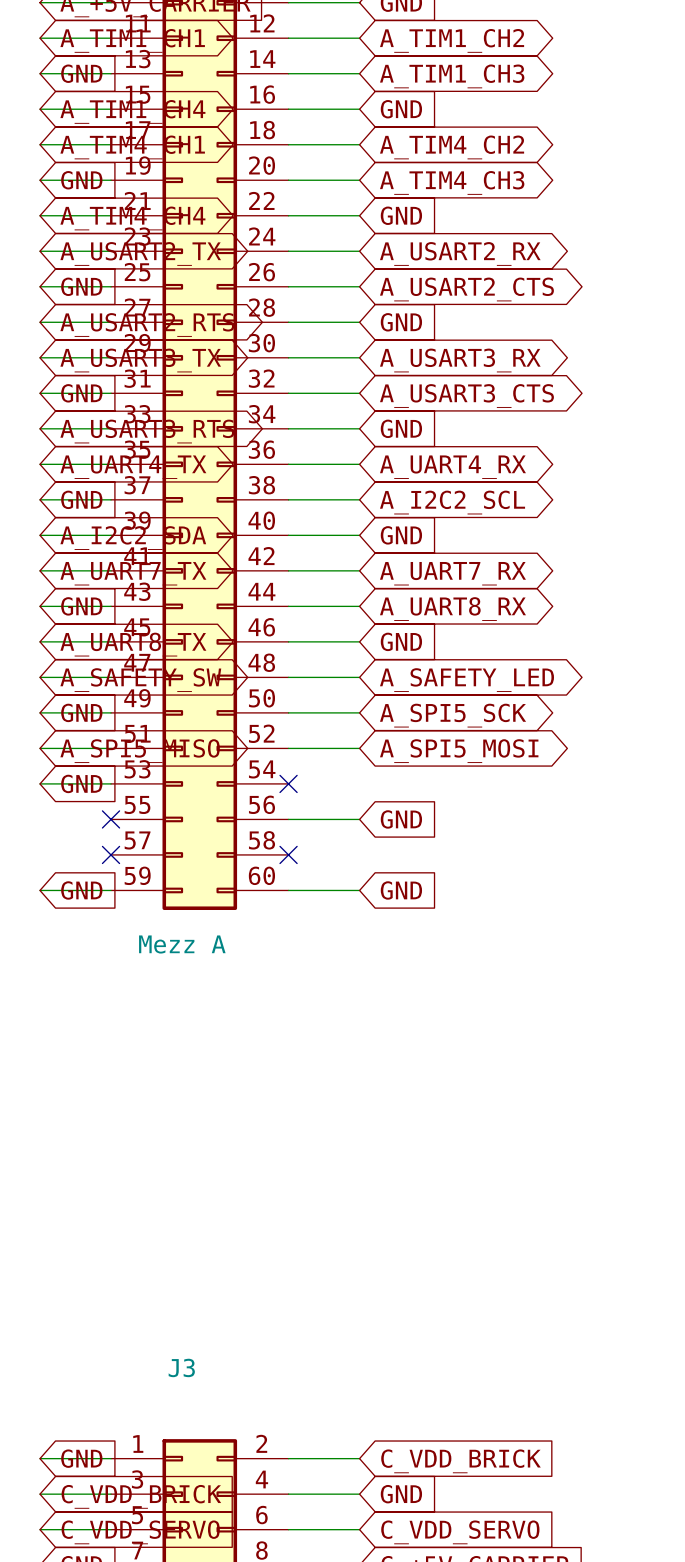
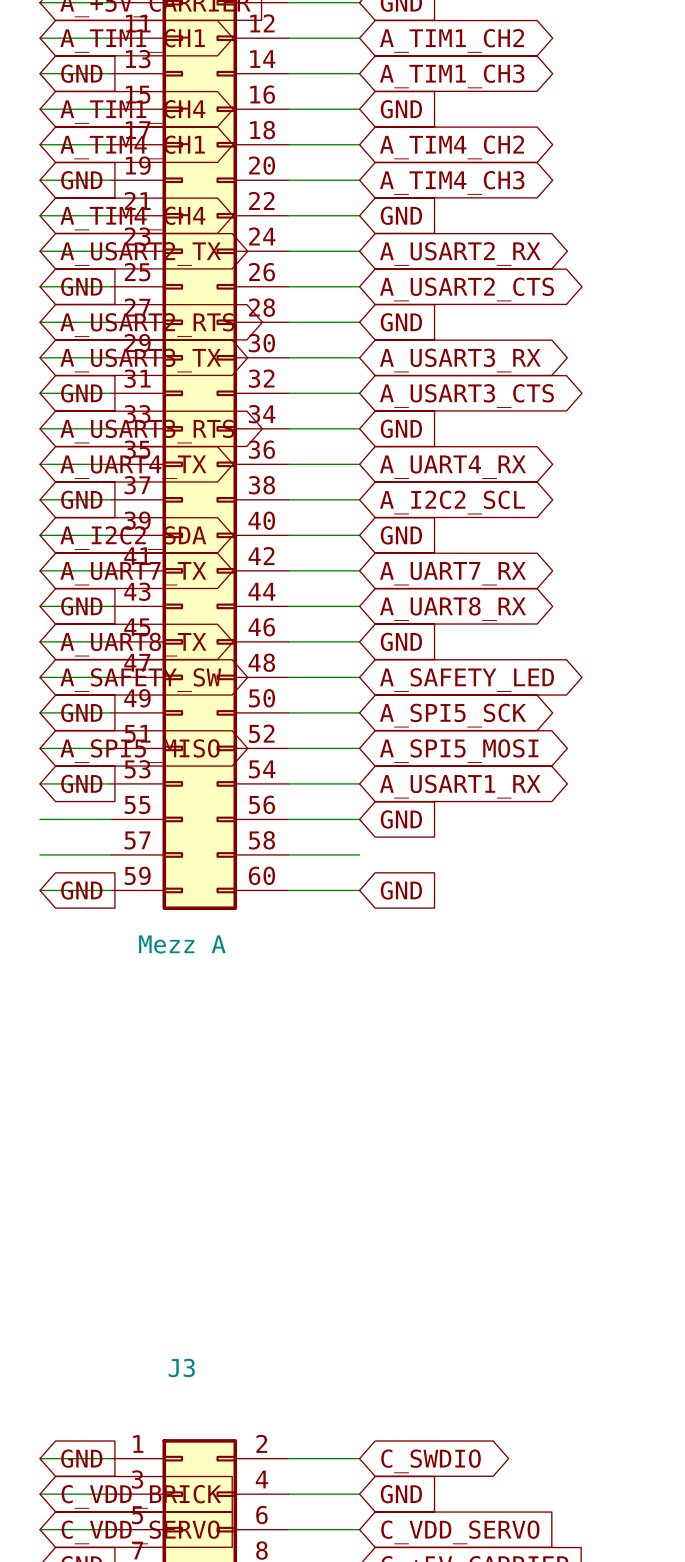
wire: none -> (288, 783) (359, 783)
no-connect mark: (288, 783) -> none
global label: none -> A_USART1_RX (460, 786)
wire: none -> (39, 819) (111, 819)
no-connect mark: (111, 819) -> none
wire: none -> (39, 854) (111, 854)
no-connect mark: (111, 854) -> none
wire: none -> (288, 854) (359, 854)
no-connect mark: (288, 854) -> none
global label shape: input (460, 1461) -> bidirectional (431, 1461)
global label: C_VDD_BRICK (460, 1461) -> C_SWDIO (431, 1461)

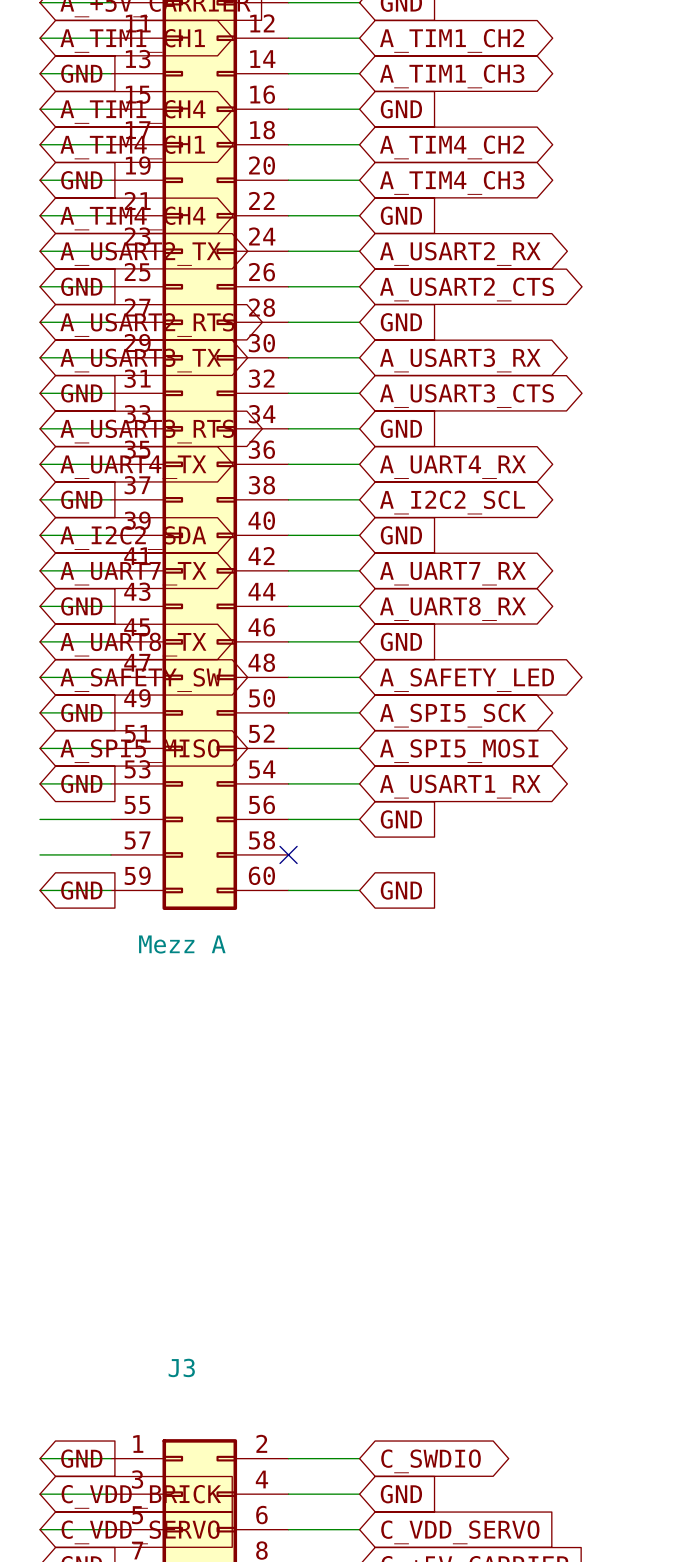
wire: (288, 854) (359, 854) -> none
no-connect mark: none -> (288, 854)

